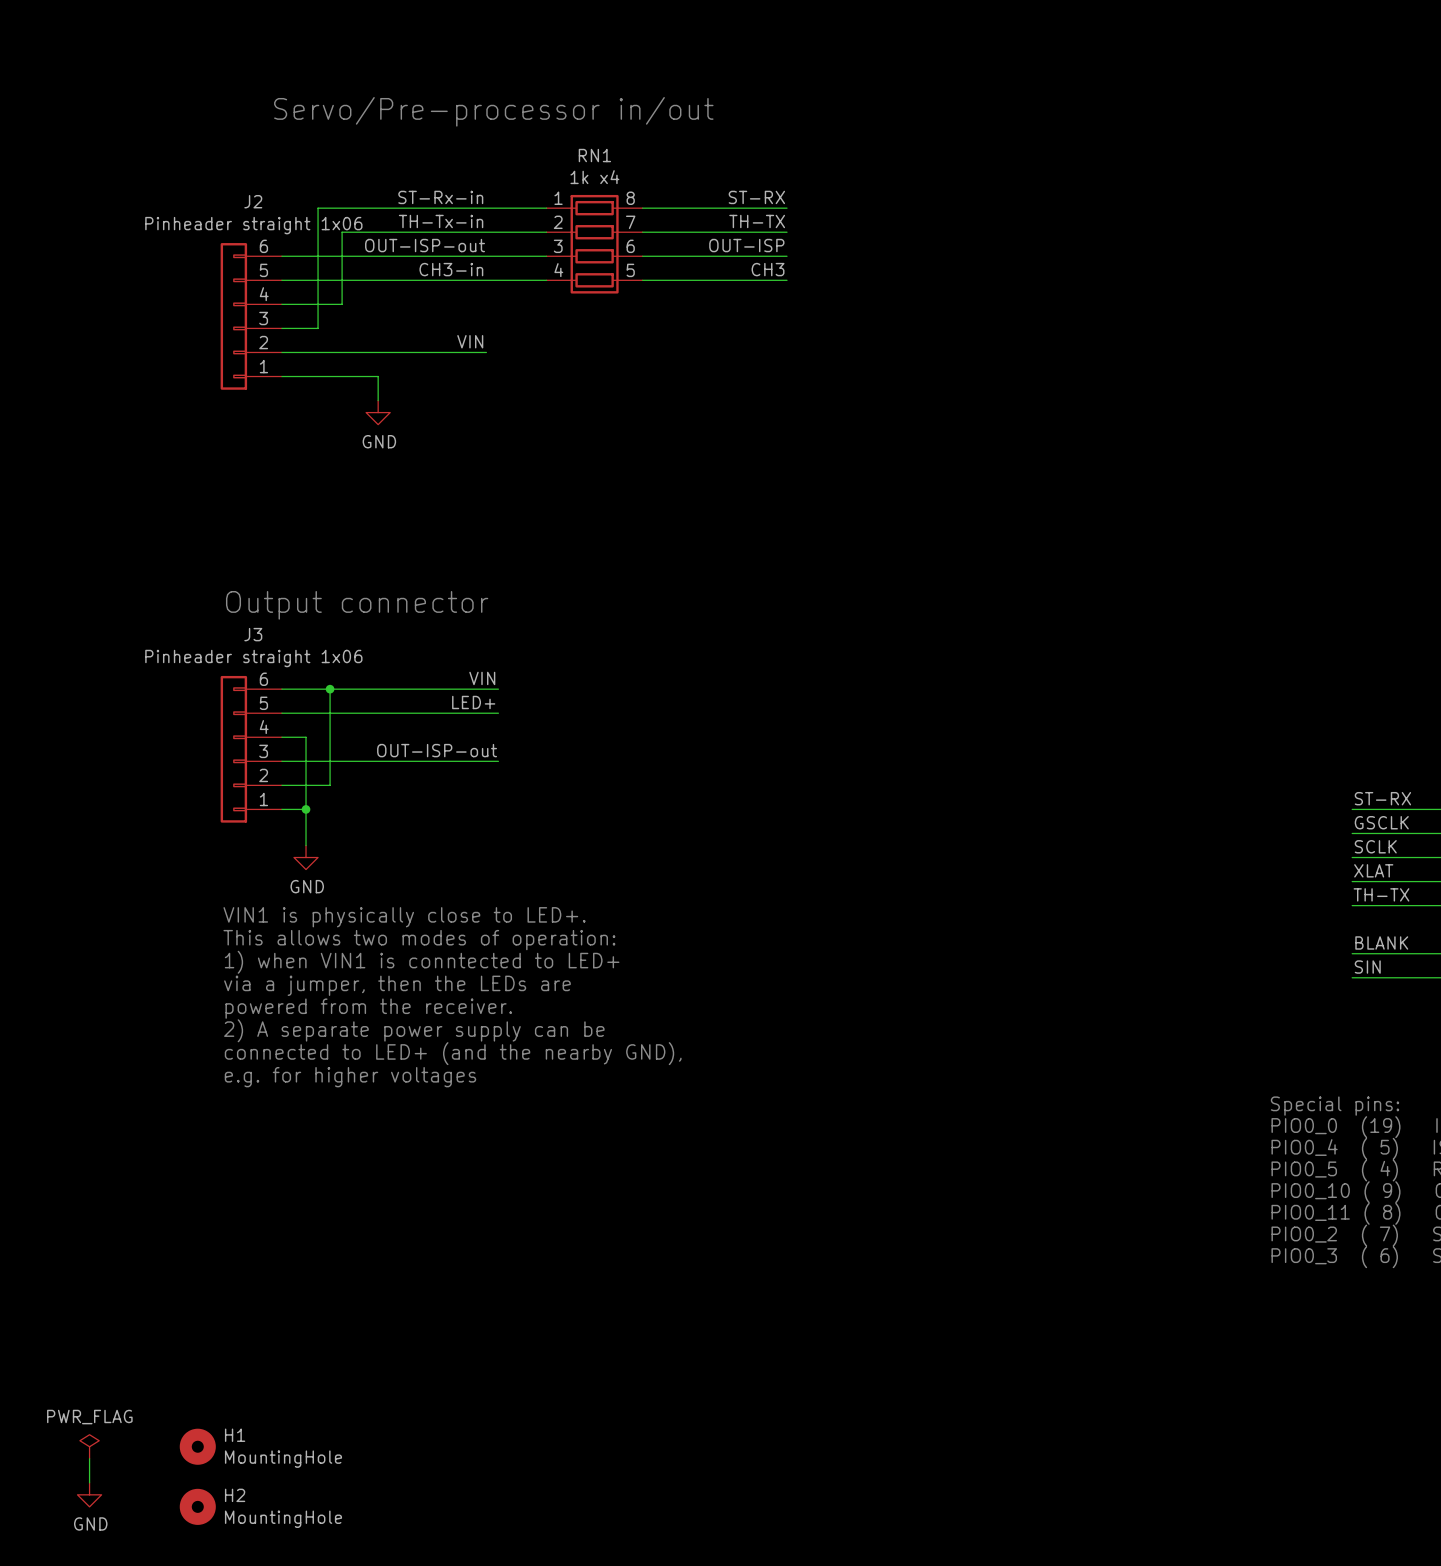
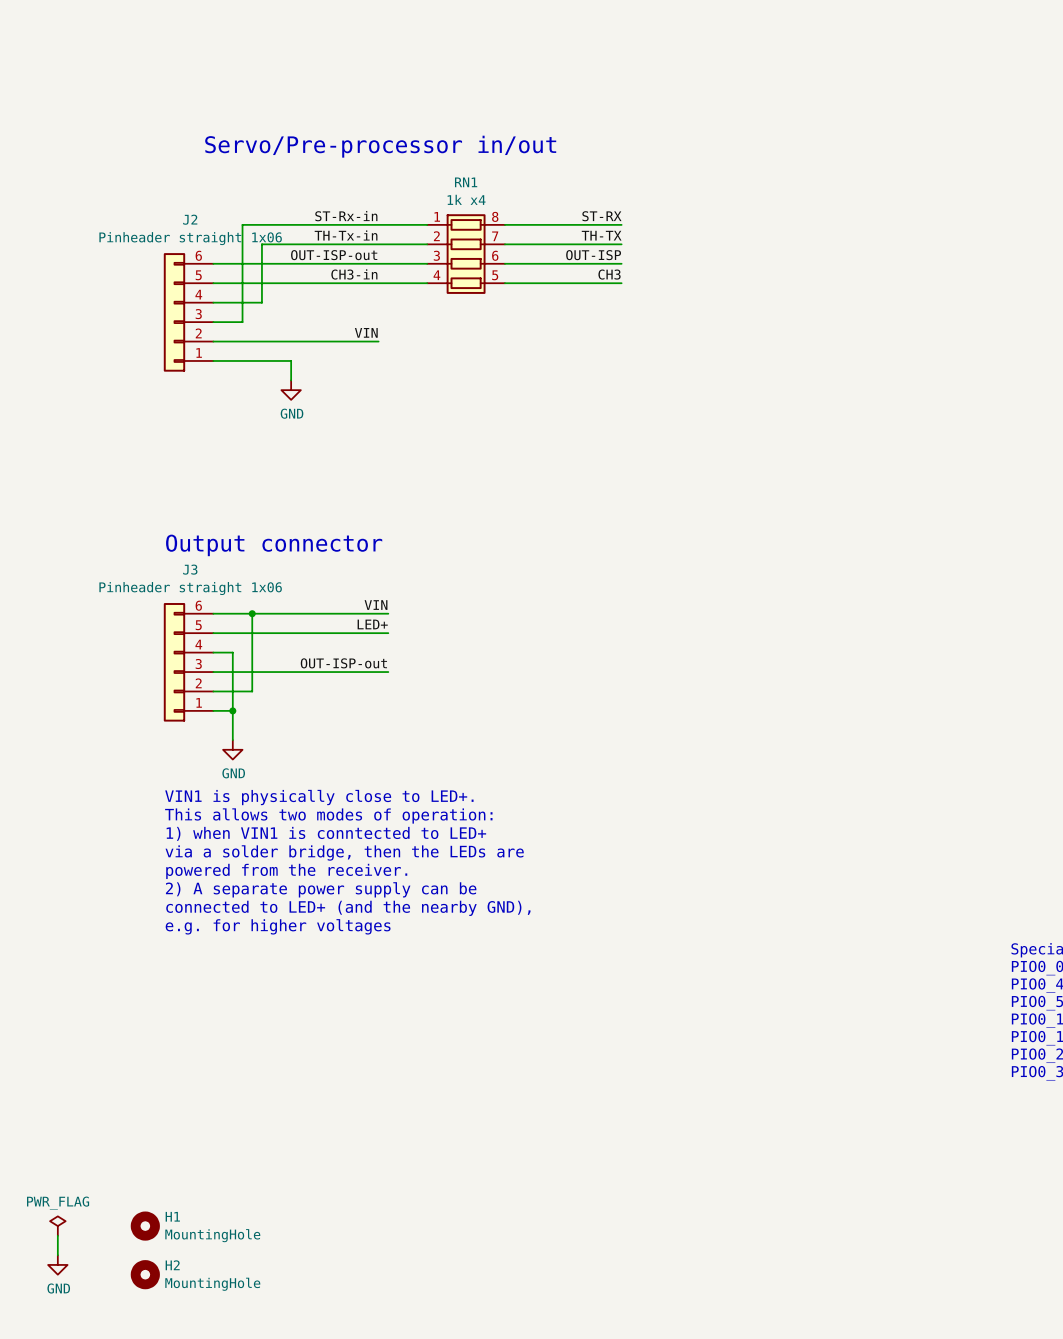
text: via a jumper, then the LEDs are (397, 985) -> via a solder bridge, then the LEDs are (344, 852)

